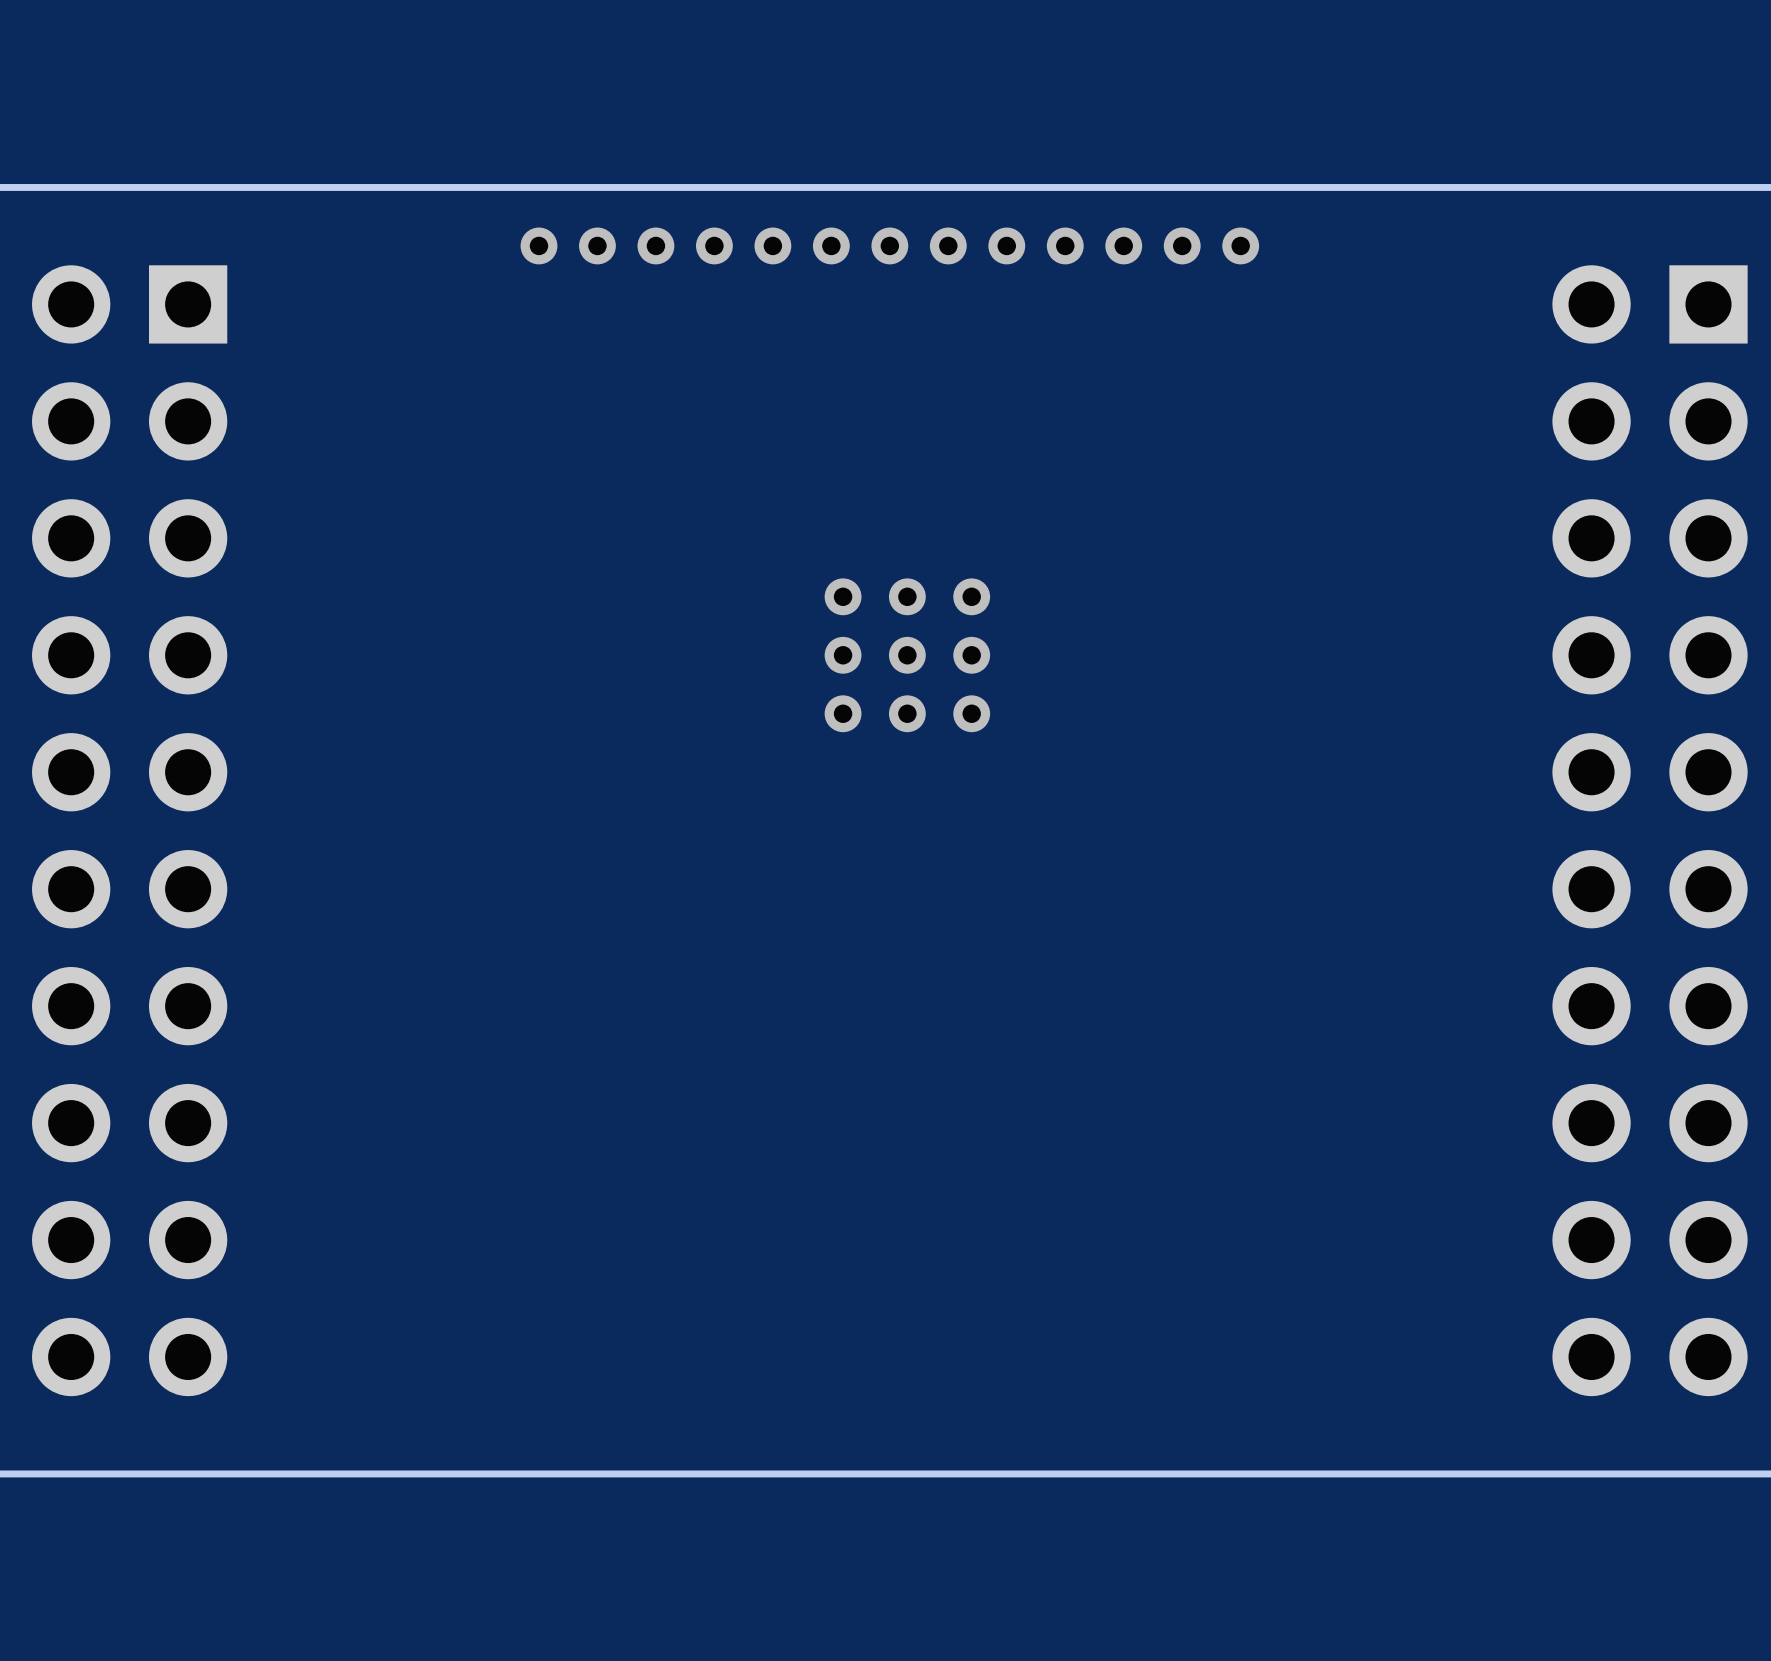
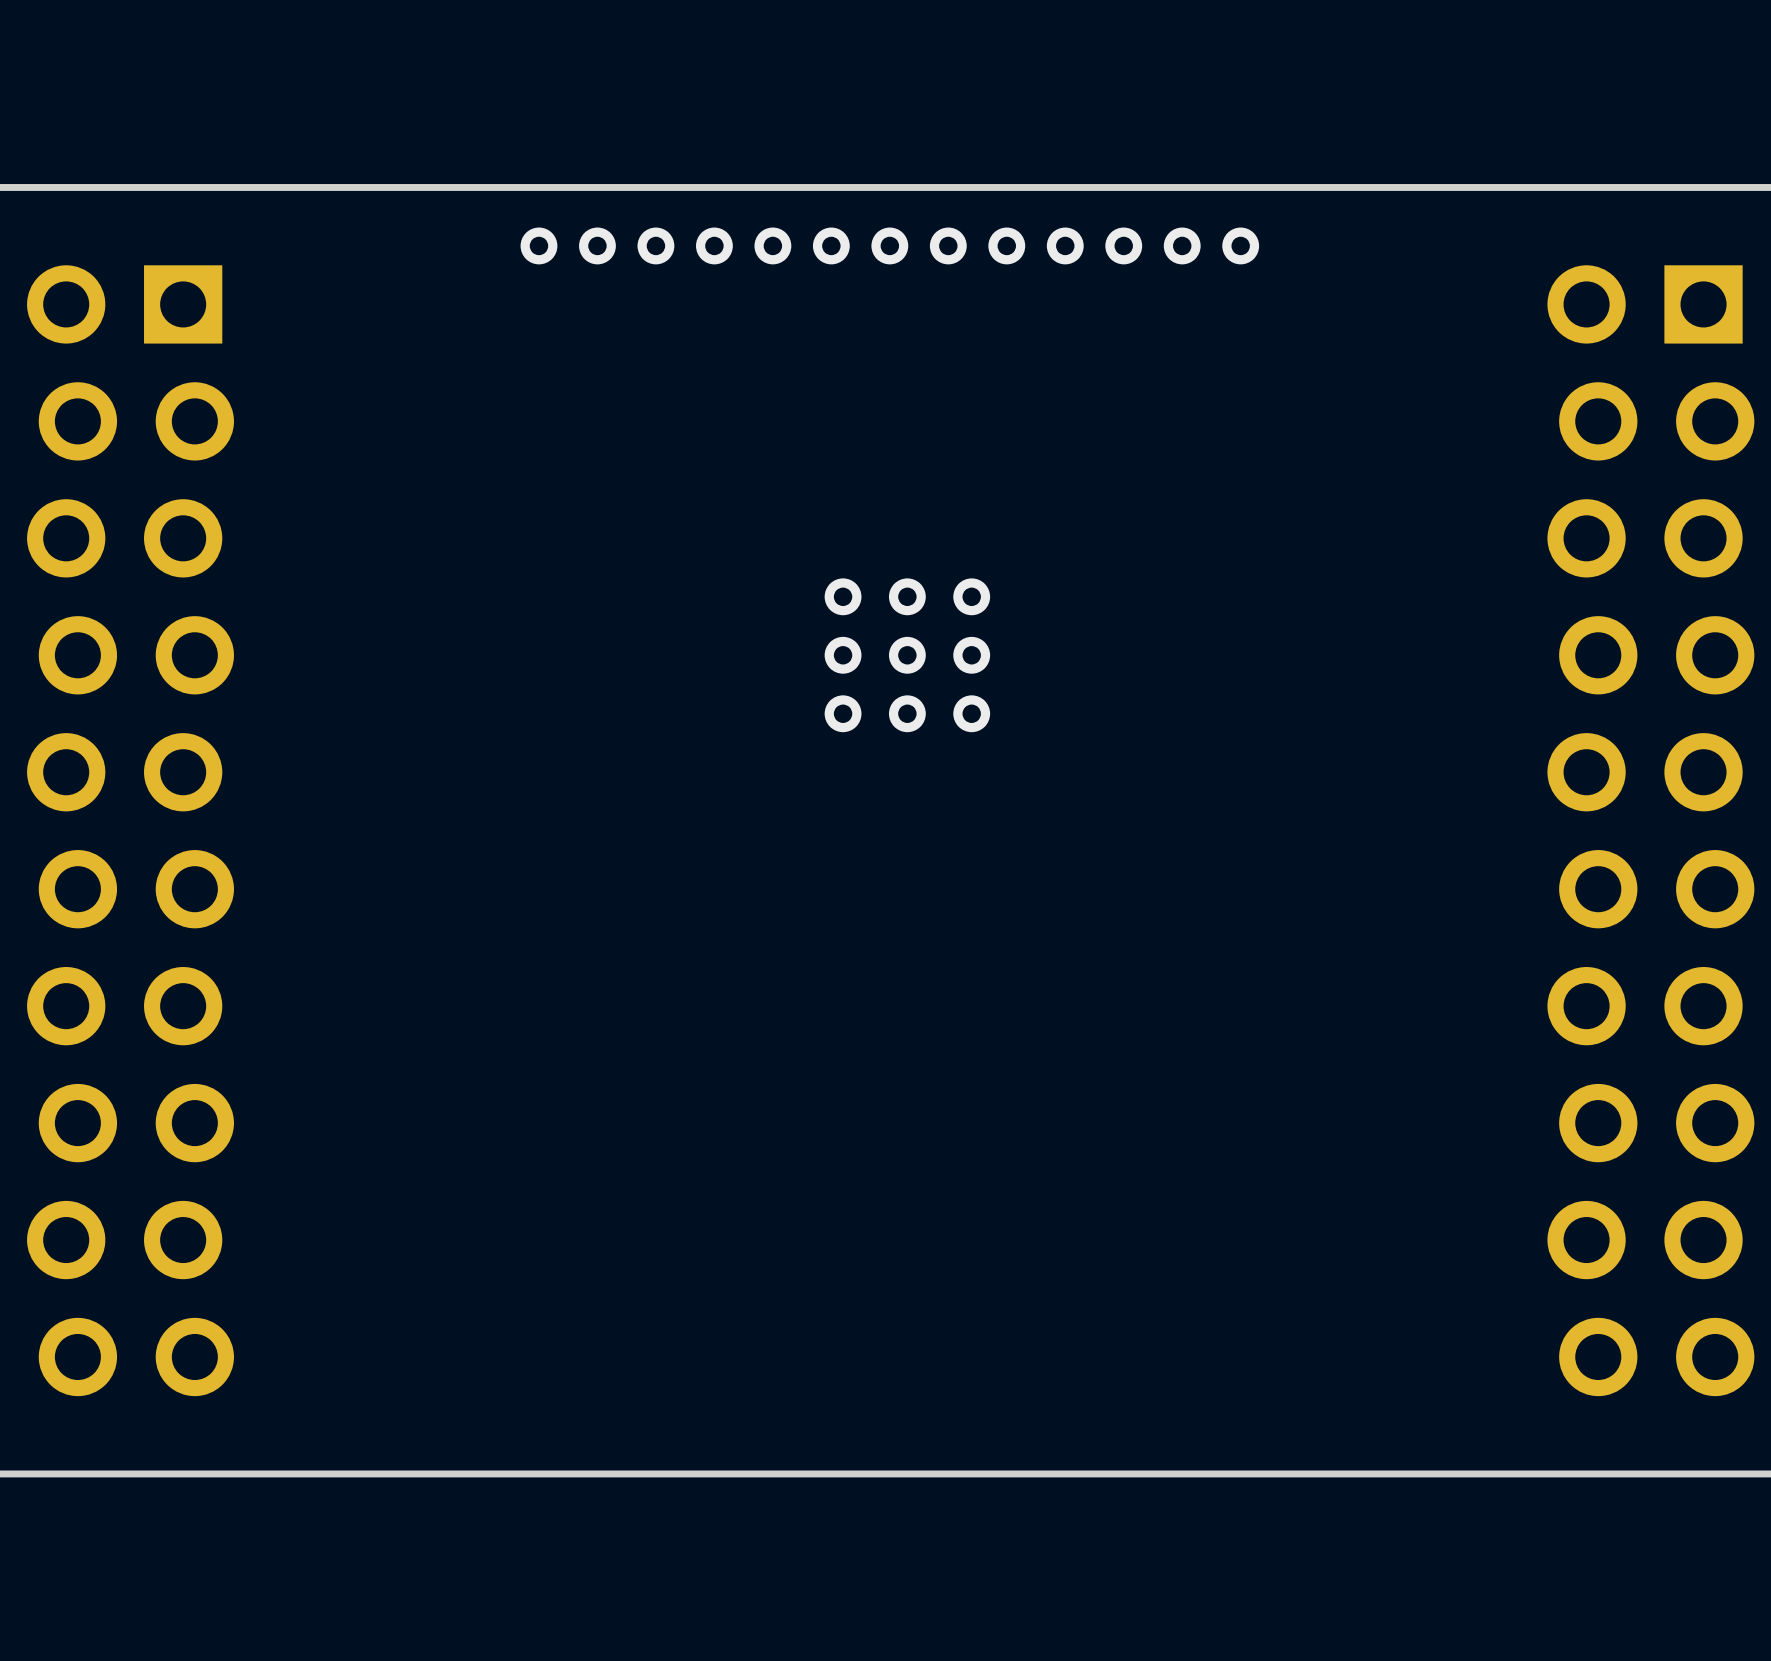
part footprint: [32, 265, 228, 1397] -> [27, 265, 234, 1397]
part footprint: [1552, 265, 1748, 1397] -> [1547, 265, 1755, 1397]

